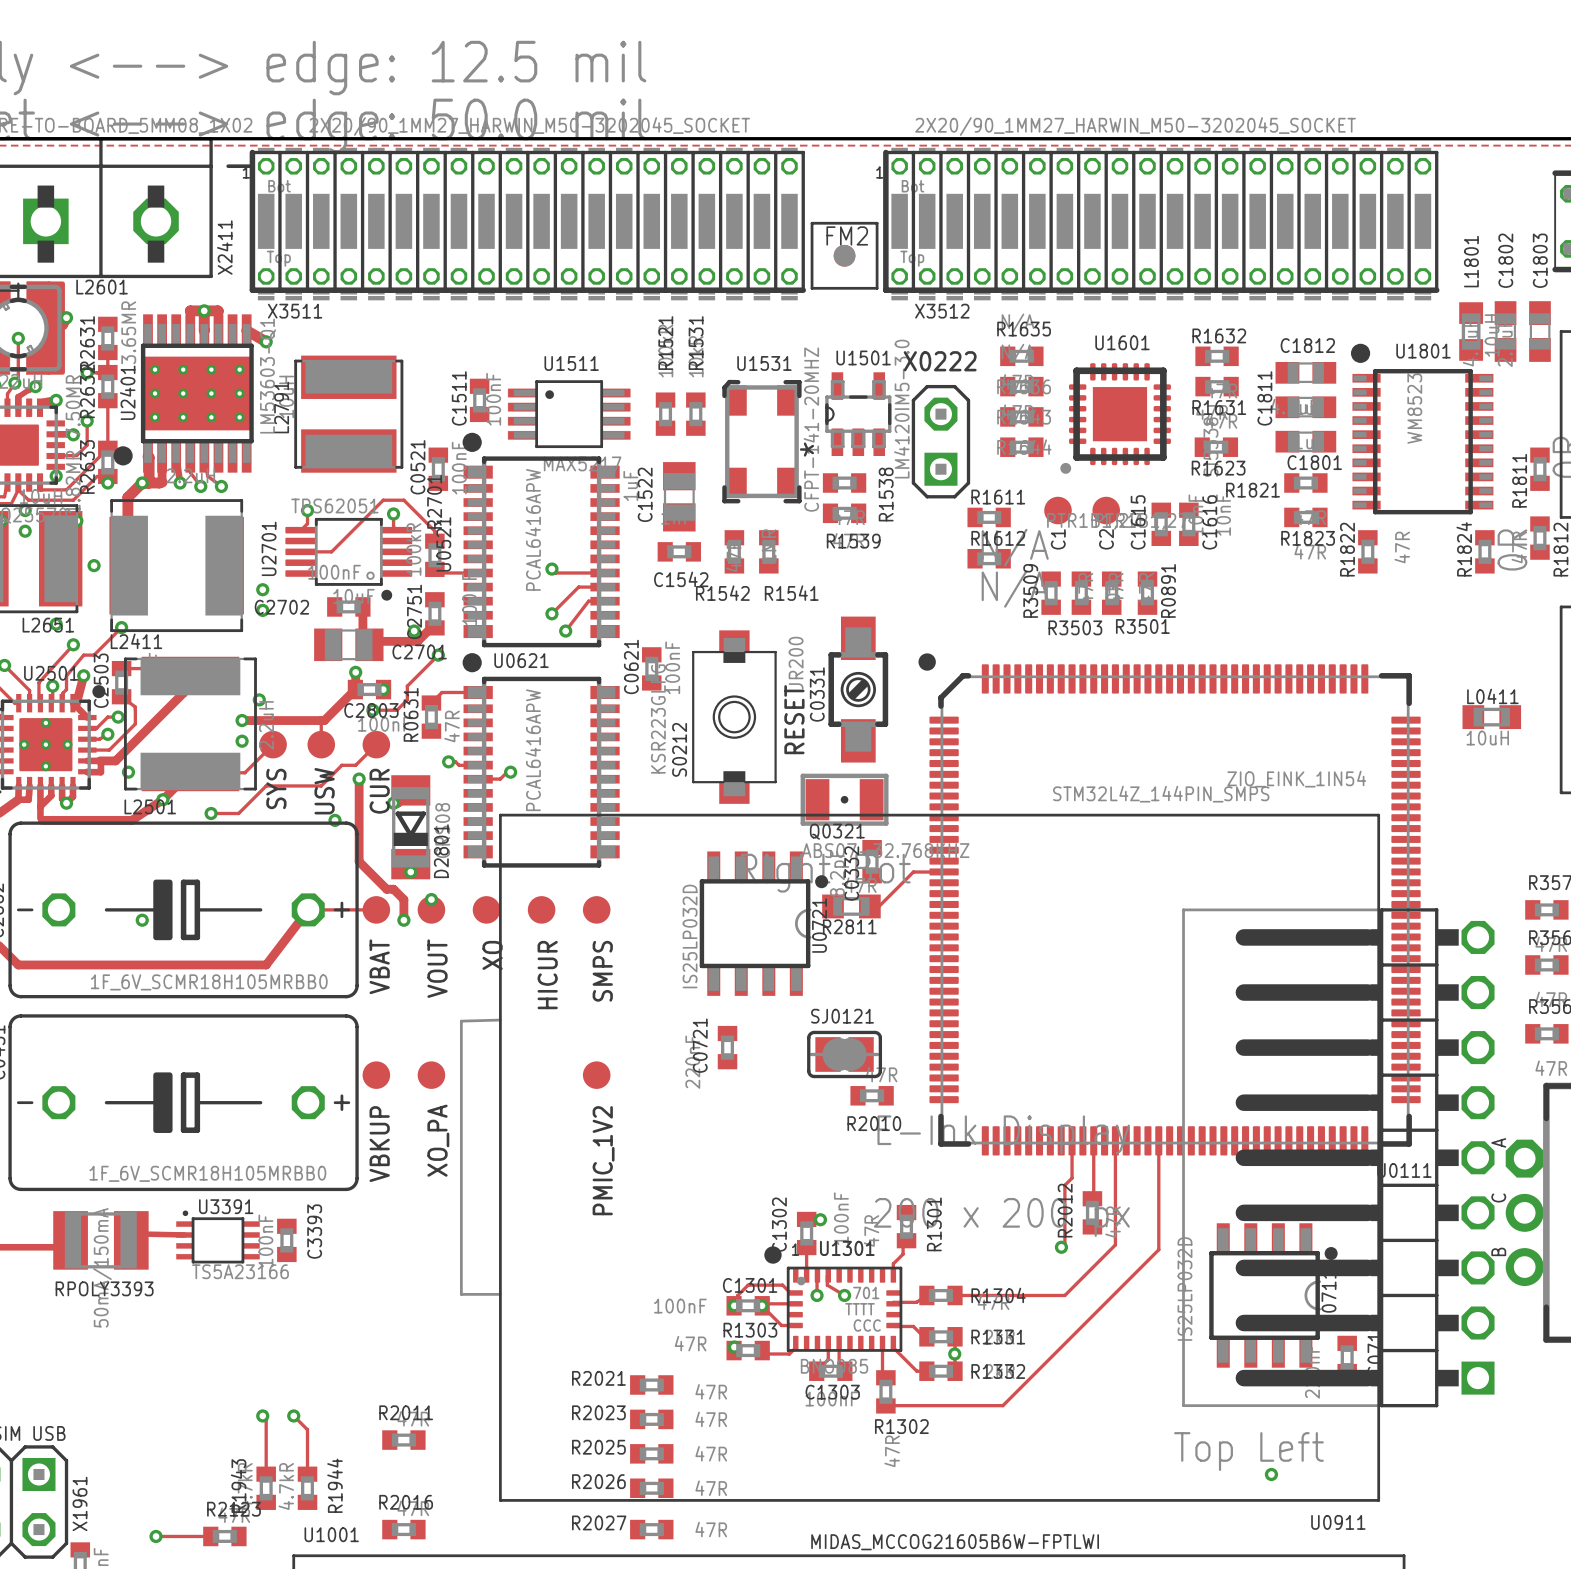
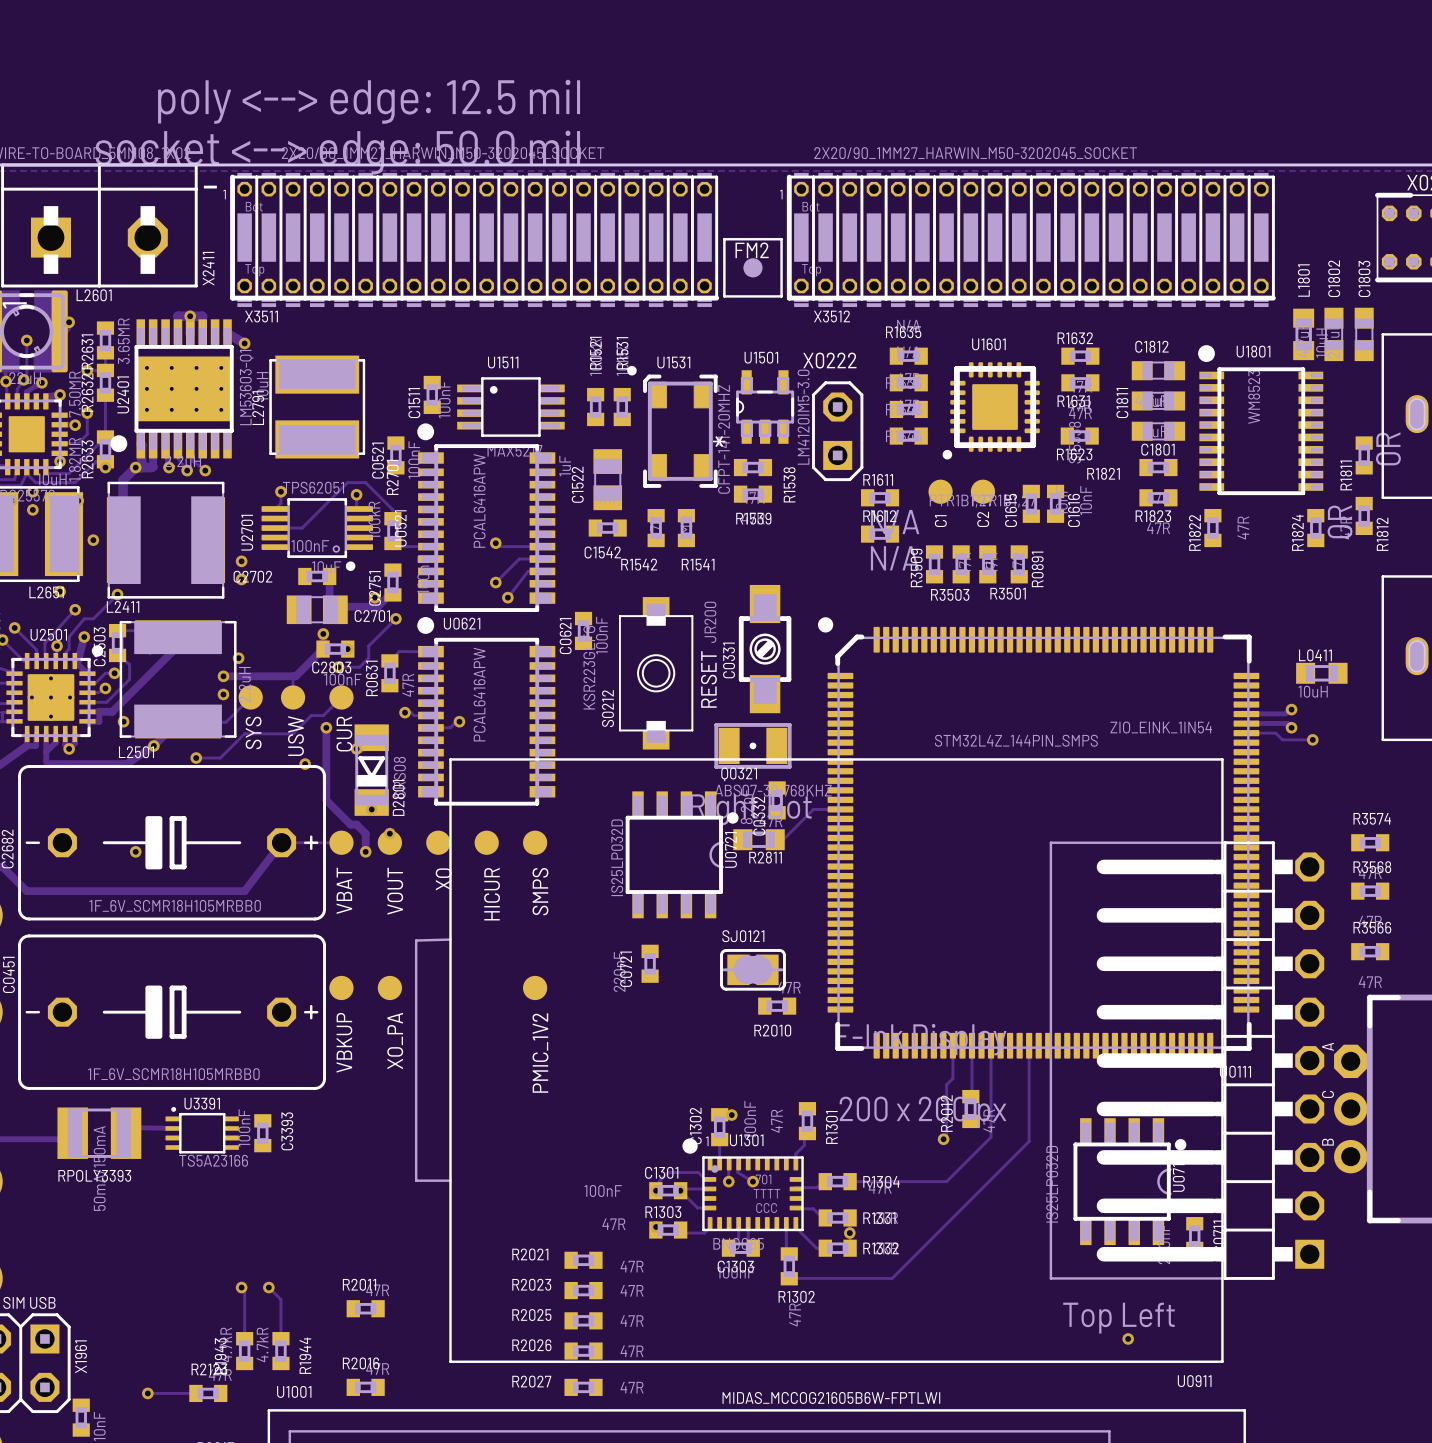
U1601 footprint: [1060, 363, 1171, 474] -> [942, 362, 1040, 460]
U1531 footprint: [722, 379, 802, 504] -> [627, 365, 718, 488]
track: none -> (1291, 707) (1285, 713) (1246, 714)
via: none -> (1291, 709)
track: none -> (1246, 723) (1287, 723) (1291, 727)
via: none -> (1291, 727)
track: none -> (1246, 733) (1275, 733) (1282, 739) (1312, 739)
via: none -> (1312, 739)

